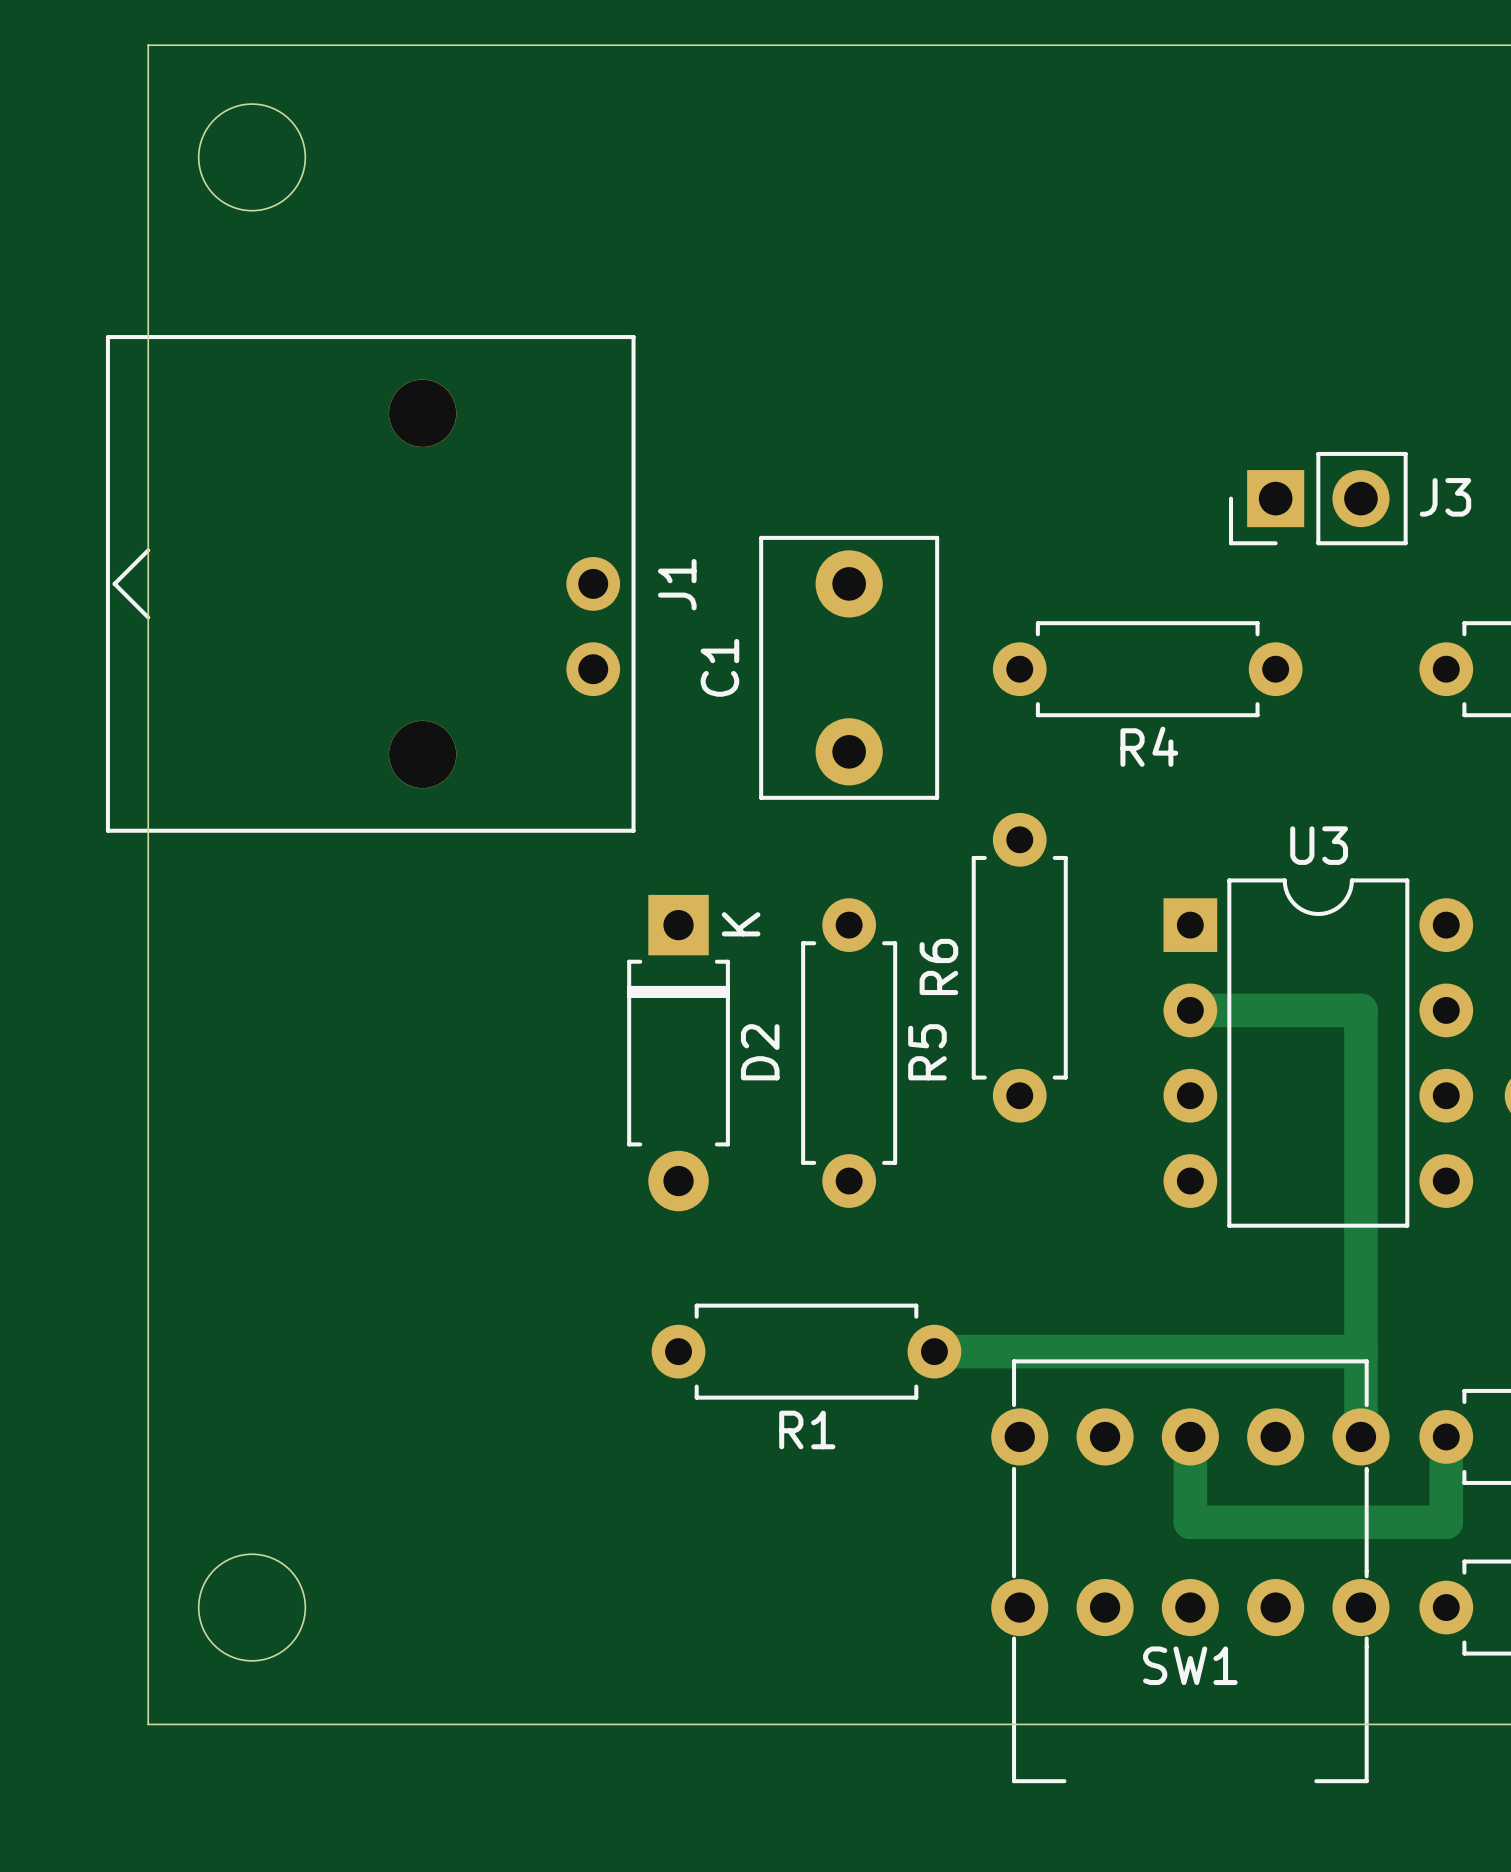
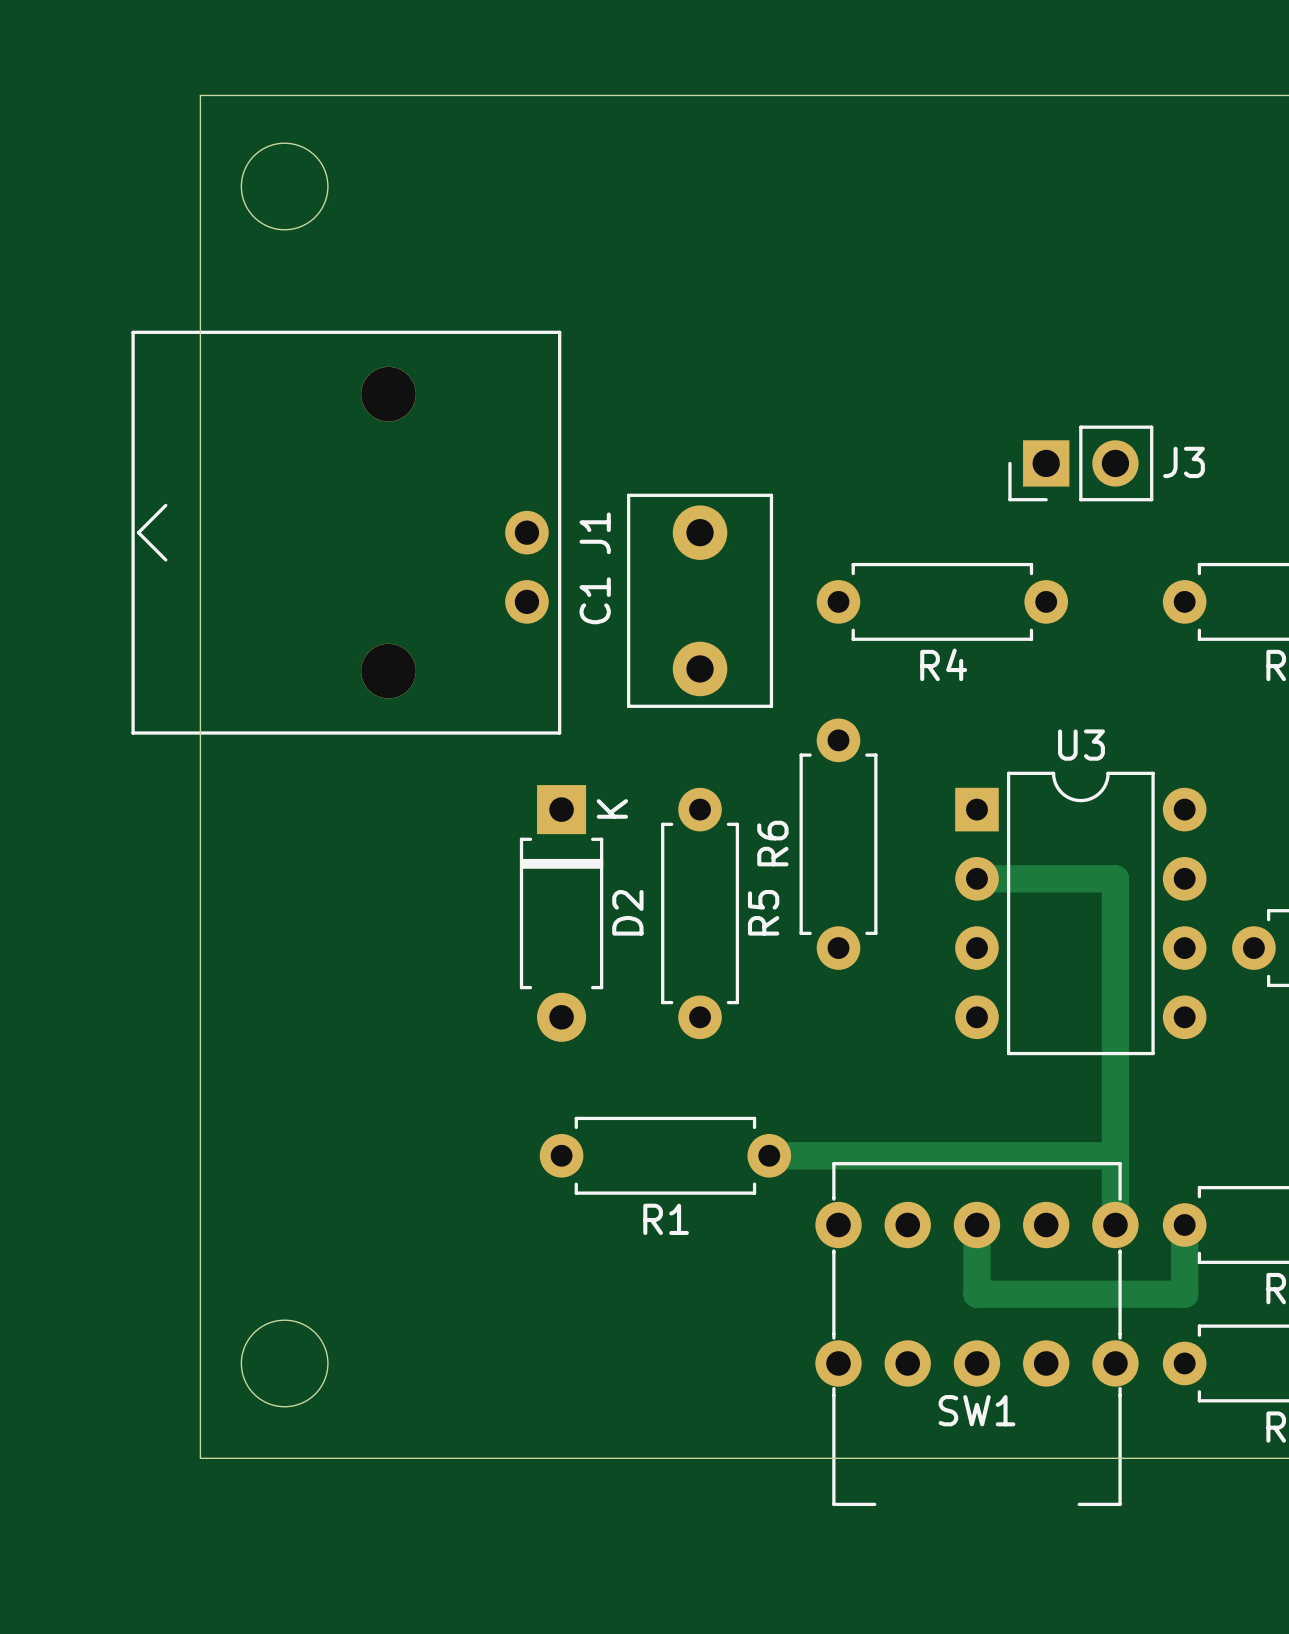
board edge: (233, 45) (148, 45) (148, 1724) (233, 1724) -> (200, 95) (200, 1458)
round board edge position: (252, 157) -> (284, 186)
J1 position: (370, 583) -> (346, 532)
round board edge position: (252, 1607) -> (284, 1363)

